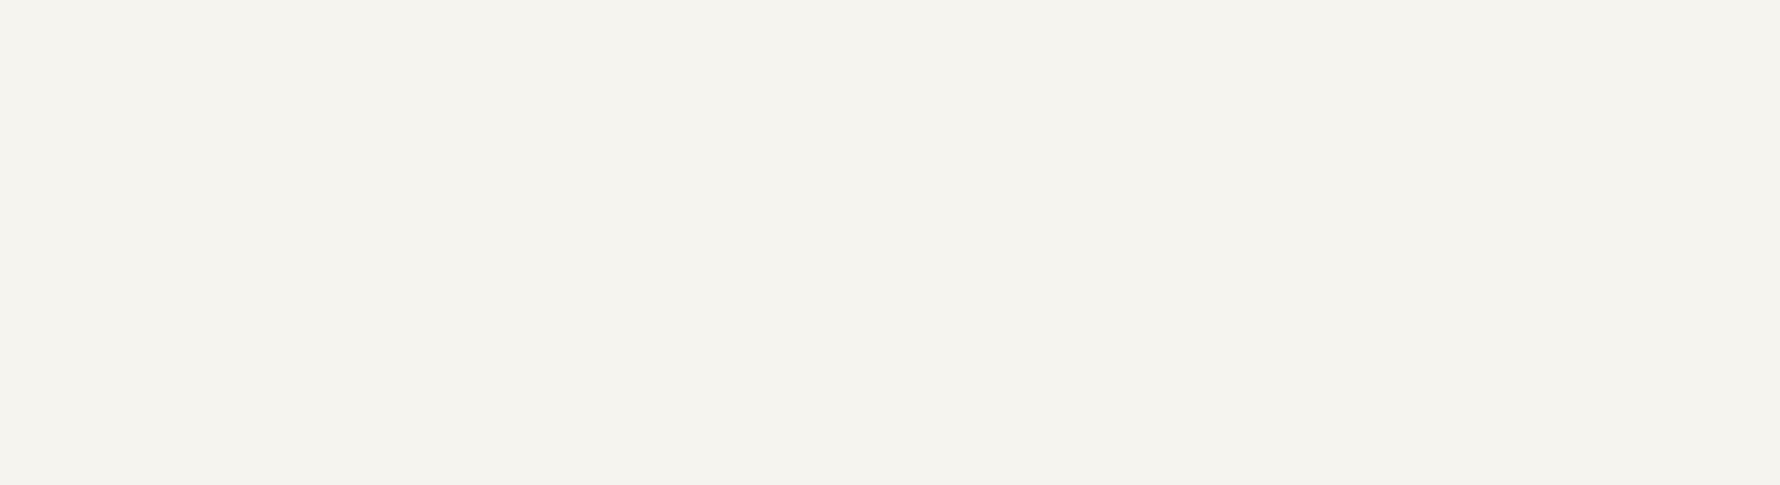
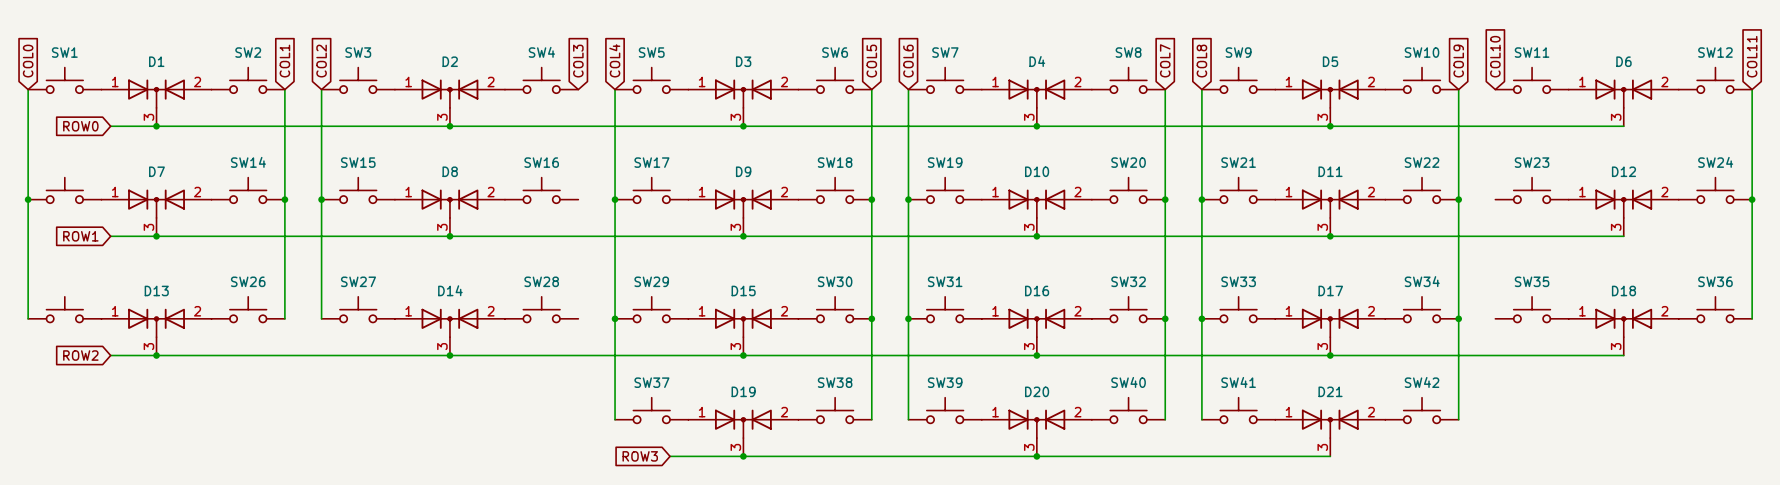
global label: none -> COL10 (1495, 56)
global label: none -> COL11 (1752, 56)
global label: none -> COL4 (614, 60)
global label: none -> COL7 (1165, 60)
global label: none -> COL0 (28, 61)
global label: none -> COL1 (284, 61)
global label: none -> COL2 (321, 61)
global label: none -> COL3 (578, 61)
global label: none -> COL5 (871, 61)
global label: none -> COL6 (908, 61)
global label: none -> COL8 (1201, 61)
global label: none -> COL9 (1458, 61)
SW1: none -> (64, 80)
SW2: none -> (248, 80)
SW3: none -> (358, 80)
SW4: none -> (541, 80)
SW5: none -> (651, 80)
SW6: none -> (835, 80)
SW7: none -> (945, 80)
SW8: none -> (1128, 80)
SW9: none -> (1238, 80)
SW10: none -> (1422, 80)
SW11: none -> (1532, 80)
SW12: none -> (1715, 80)
wire: none -> (28, 89) (28, 318)
wire: none -> (284, 89) (284, 318)
wire: none -> (321, 89) (321, 318)
wire: none -> (615, 89) (615, 419)
wire: none -> (871, 89) (871, 419)
wire: none -> (908, 89) (908, 419)
wire: none -> (1165, 89) (1165, 419)
wire: none -> (1201, 89) (1201, 419)
wire: none -> (1458, 89) (1458, 419)
wire: none -> (1752, 89) (1752, 318)
D1: none -> (156, 102)
D2: none -> (449, 102)
D3: none -> (743, 102)
D4: none -> (1036, 102)
D5: none -> (1330, 102)
D6: none -> (1623, 102)
global label: none -> ROW0 (80, 126)
wire: none -> (110, 126) (1623, 126)
junction: none -> (156, 126)
junction: none -> (449, 126)
junction: none -> (743, 126)
junction: none -> (1036, 126)
junction: none -> (1330, 126)
part: none -> (64, 190)
SW14: none -> (248, 190)
SW15: none -> (358, 190)
SW16: none -> (541, 190)
SW17: none -> (651, 190)
SW18: none -> (835, 190)
SW19: none -> (945, 190)
SW20: none -> (1128, 190)
SW21: none -> (1238, 190)
SW22: none -> (1422, 190)
SW23: none -> (1532, 190)
SW24: none -> (1715, 190)
junction: none -> (28, 199)
junction: none -> (284, 199)
junction: none -> (321, 199)
junction: none -> (615, 199)
junction: none -> (871, 199)
junction: none -> (908, 199)
junction: none -> (1165, 199)
junction: none -> (1201, 199)
junction: none -> (1458, 199)
junction: none -> (1752, 199)
D7: none -> (156, 212)
D8: none -> (449, 212)
D9: none -> (743, 212)
D10: none -> (1036, 212)
D11: none -> (1330, 212)
D12: none -> (1623, 212)
global label: none -> ROW1 (80, 236)
wire: none -> (110, 236) (1623, 236)
junction: none -> (156, 236)
junction: none -> (449, 236)
junction: none -> (743, 236)
junction: none -> (1036, 236)
junction: none -> (1330, 236)
part: none -> (64, 309)
SW26: none -> (248, 309)
SW27: none -> (358, 309)
SW28: none -> (541, 309)
SW29: none -> (651, 309)
SW30: none -> (835, 309)
SW31: none -> (945, 309)
SW32: none -> (1128, 309)
SW33: none -> (1238, 309)
SW34: none -> (1422, 309)
SW35: none -> (1532, 309)
SW36: none -> (1715, 309)
junction: none -> (615, 318)
junction: none -> (871, 318)
junction: none -> (908, 318)
junction: none -> (1165, 318)
junction: none -> (1201, 318)
junction: none -> (1458, 318)
D13: none -> (156, 332)
D14: none -> (449, 332)
D15: none -> (743, 332)
D16: none -> (1036, 332)
D17: none -> (1330, 332)
D18: none -> (1623, 332)
global label: none -> ROW2 (80, 355)
wire: none -> (110, 355) (1623, 355)
junction: none -> (156, 355)
junction: none -> (449, 355)
junction: none -> (743, 355)
junction: none -> (1036, 355)
junction: none -> (1330, 355)
SW37: none -> (651, 410)
SW38: none -> (835, 410)
SW39: none -> (945, 410)
SW40: none -> (1128, 410)
SW41: none -> (1238, 410)
SW42: none -> (1422, 410)
D19: none -> (743, 433)
D20: none -> (1036, 433)
D21: none -> (1330, 433)
global label: none -> ROW3 (640, 456)
wire: none -> (670, 456) (1330, 456)
junction: none -> (743, 456)
junction: none -> (1036, 456)

